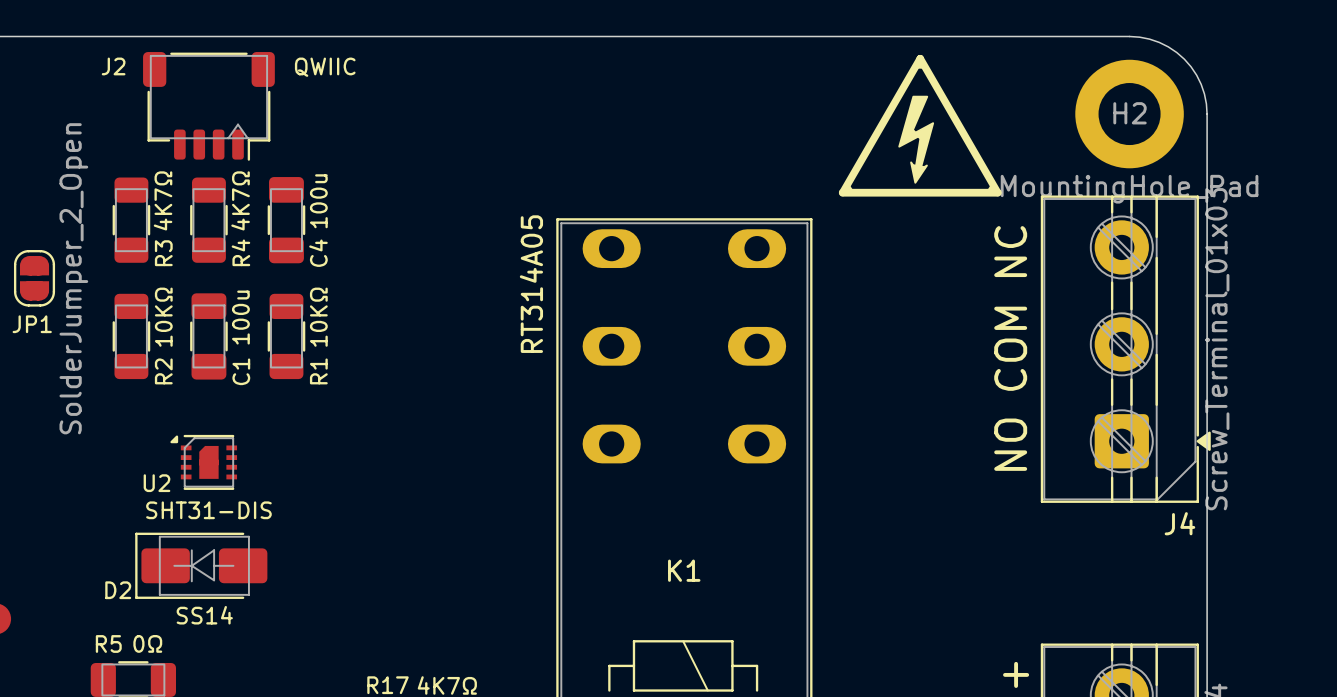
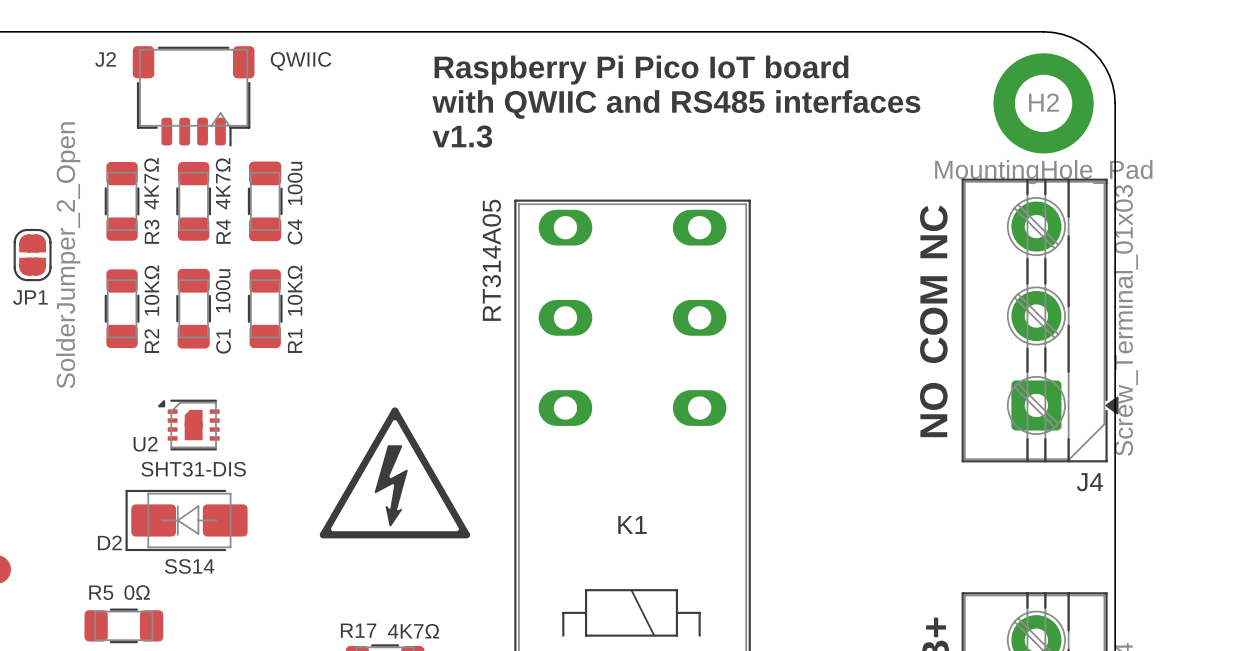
drawing: [838, 54, 1002, 197] -> none
text: none -> Raspberry Pi Pico IoT board (641, 70)
text: none -> with QWIIC and RS485 interfaces (676, 104)
text: none -> v1.3 (462, 136)
drawing: none -> [319, 407, 471, 539]

